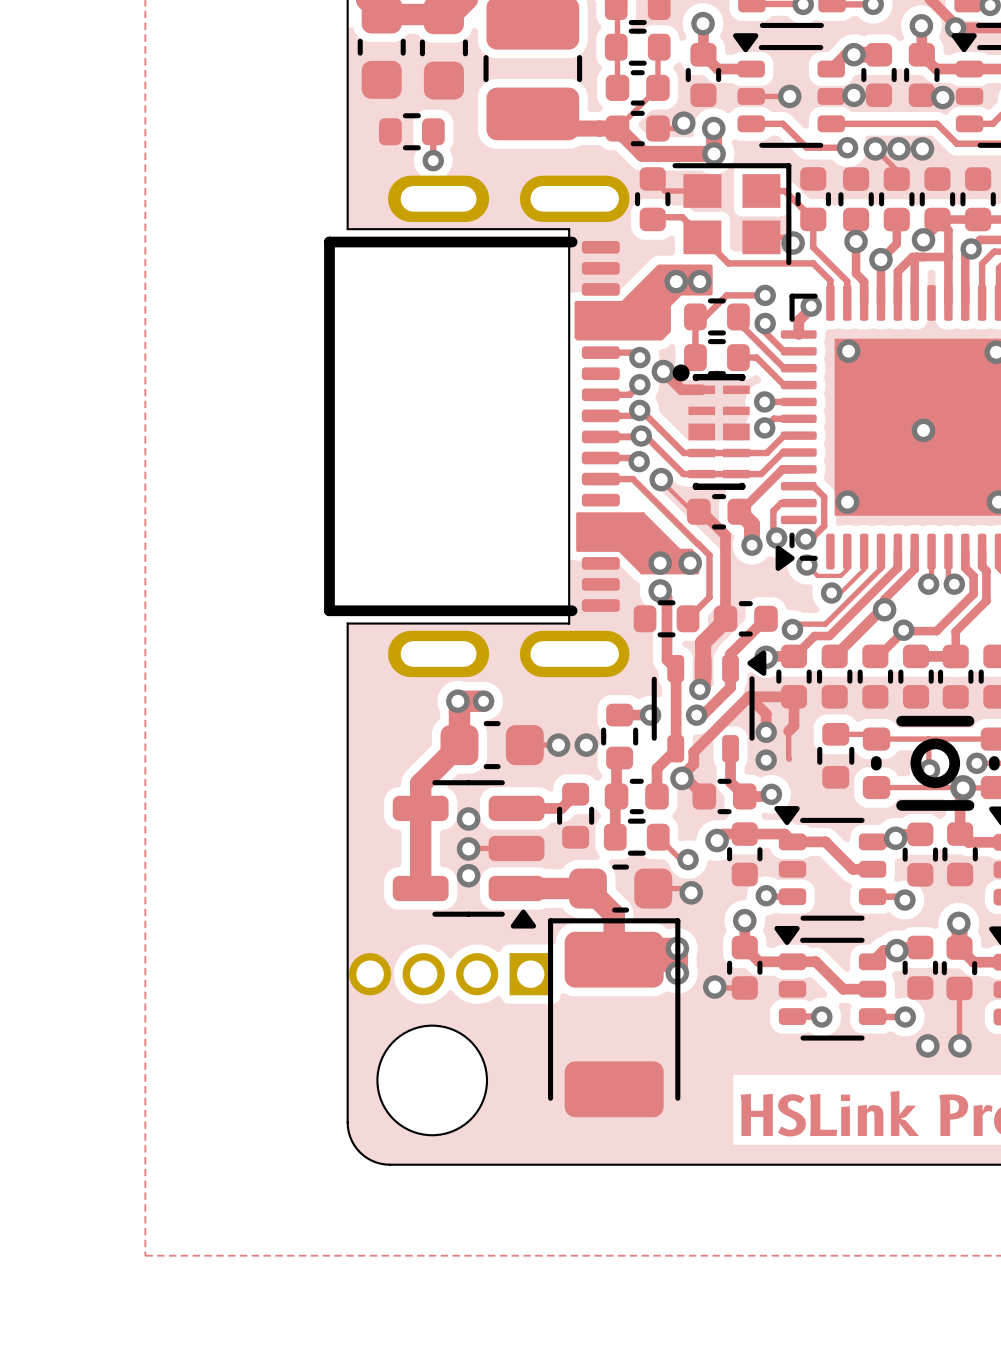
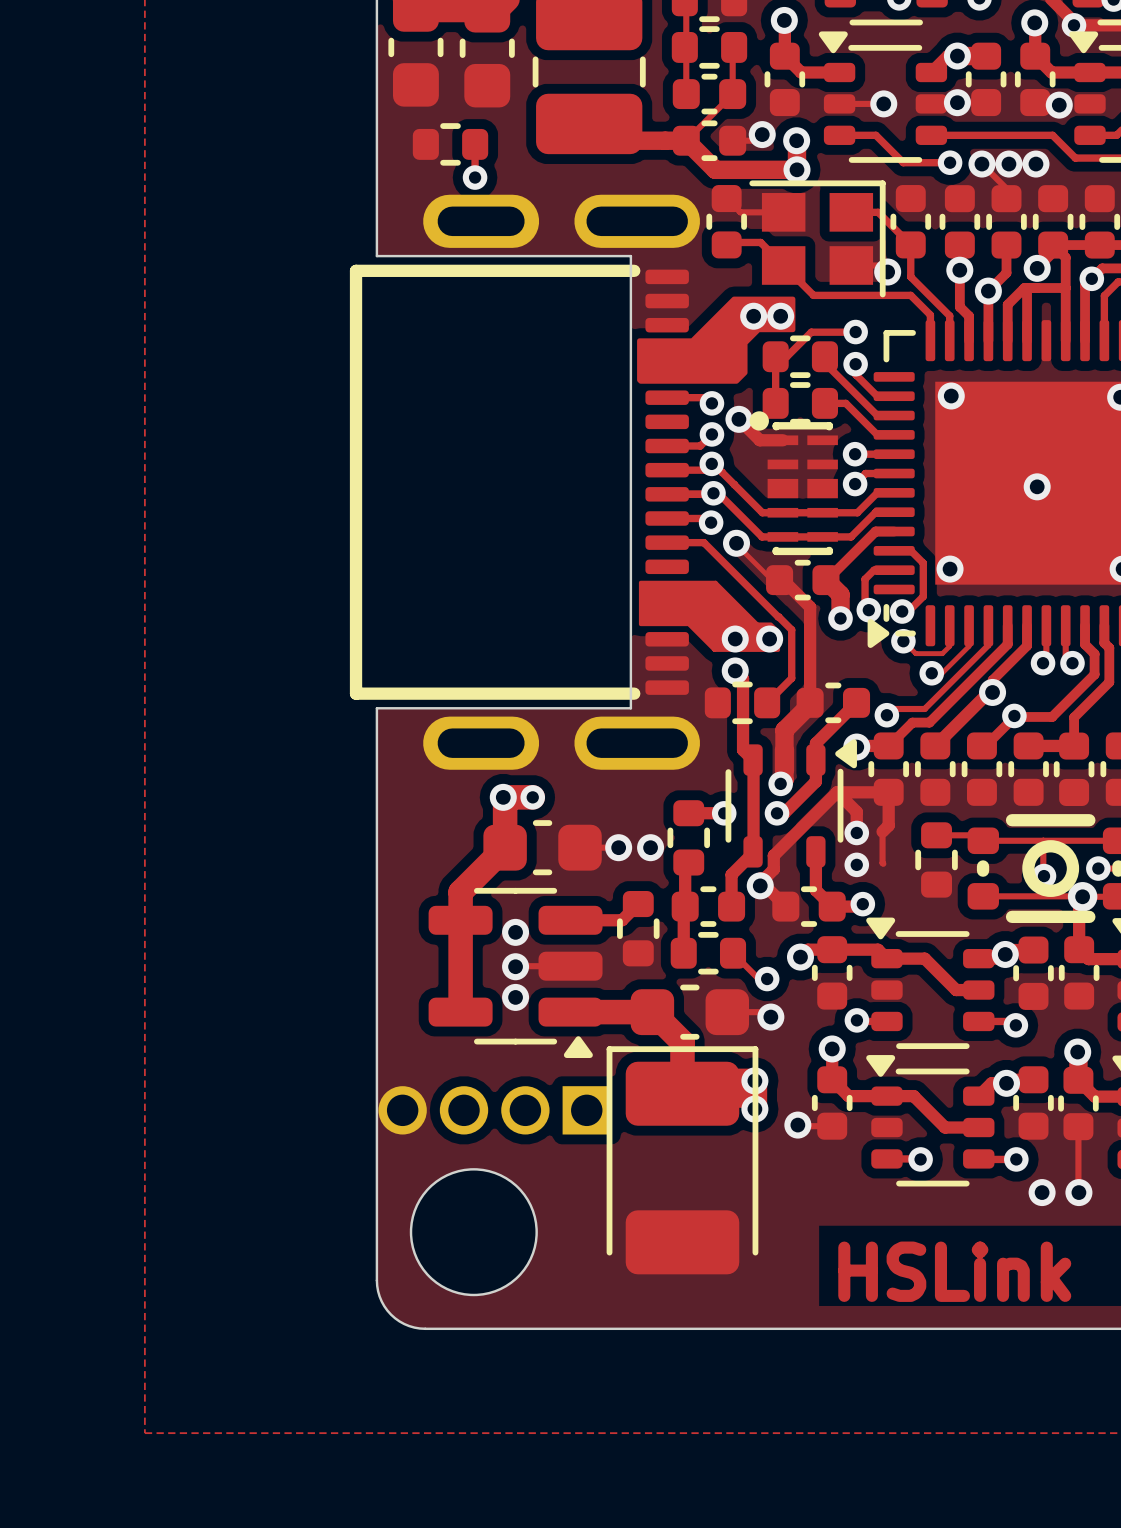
track: (811, 306) (798, 320) (798, 334) -> none
via: (811, 306) -> none

